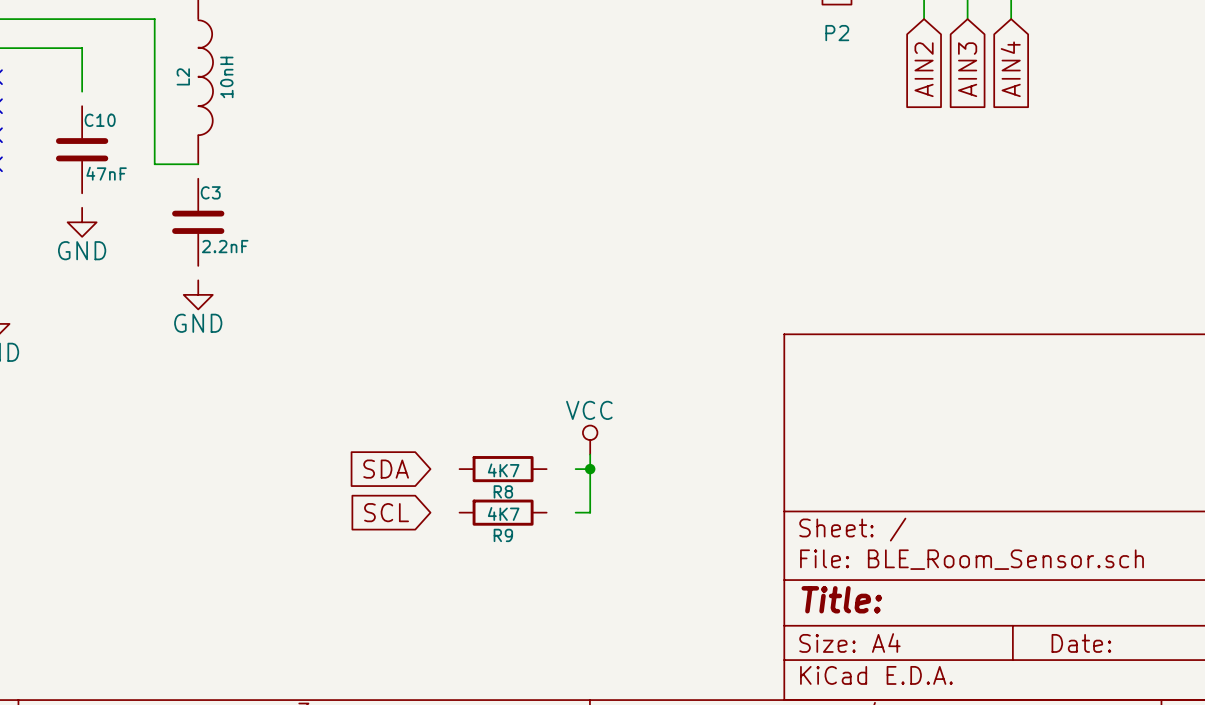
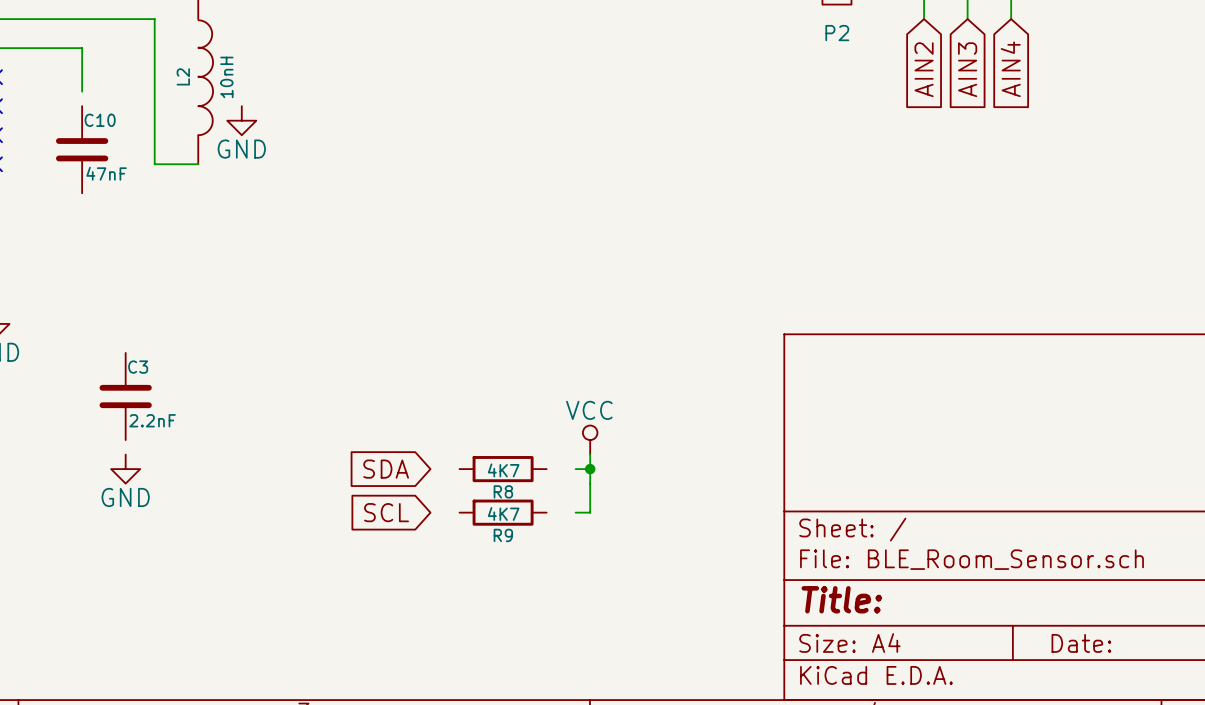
power symbol: none -> GND (241, 120)
power symbol: GND (82, 222) -> none
C3 position: (198, 222) -> (125, 396)
power symbol: GND (198, 294) -> none
power symbol: none -> GND (125, 469)

